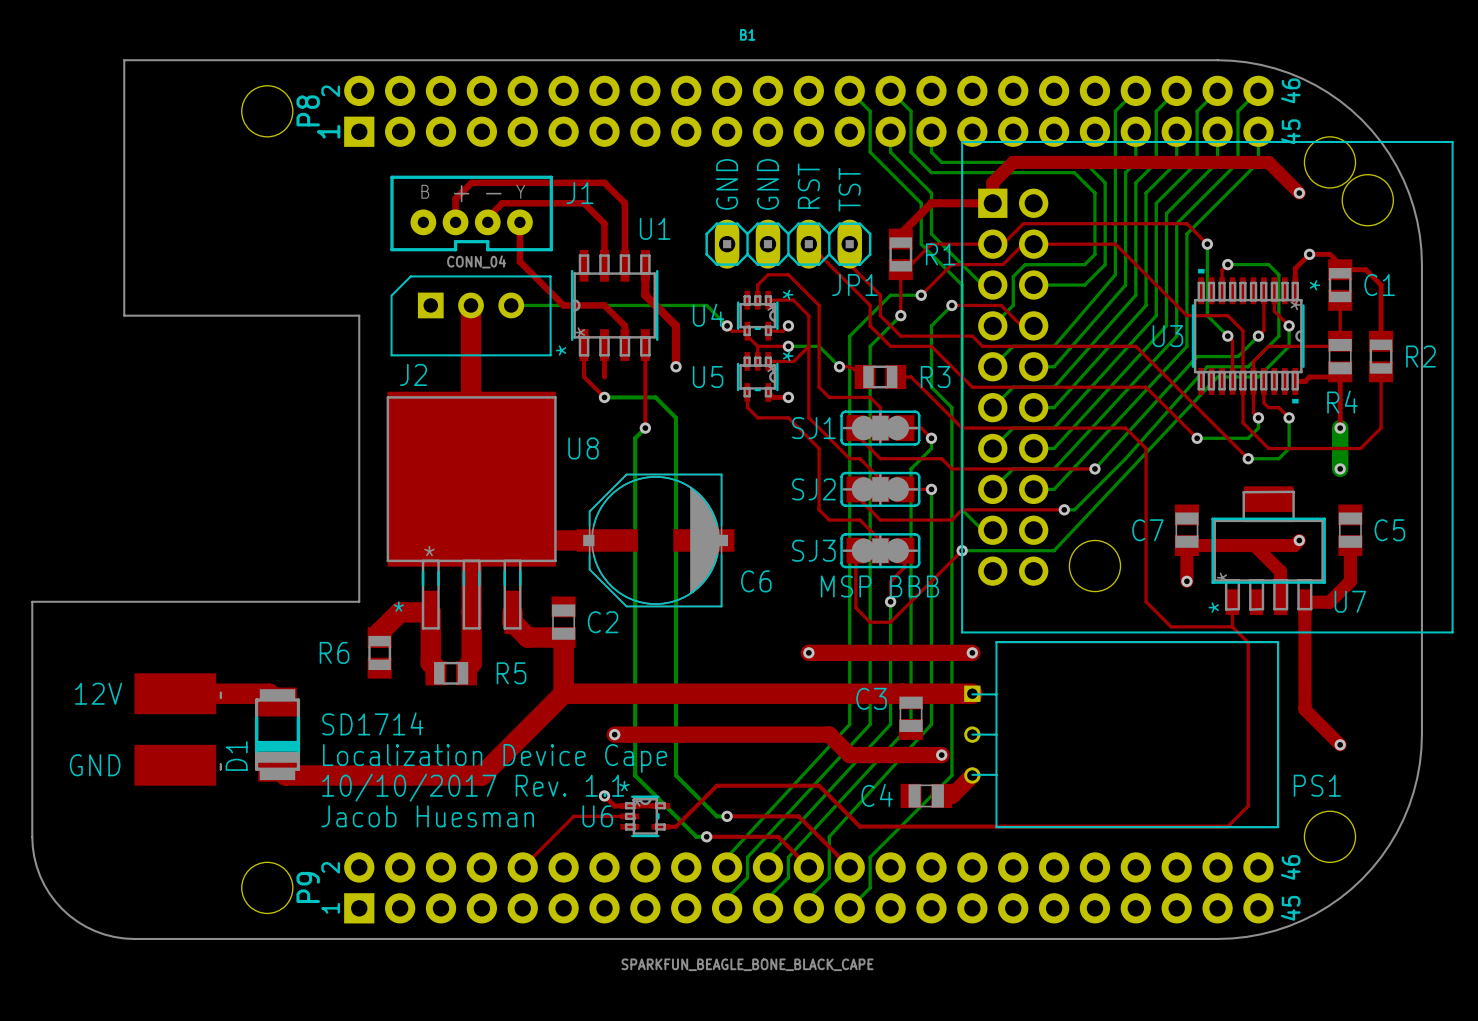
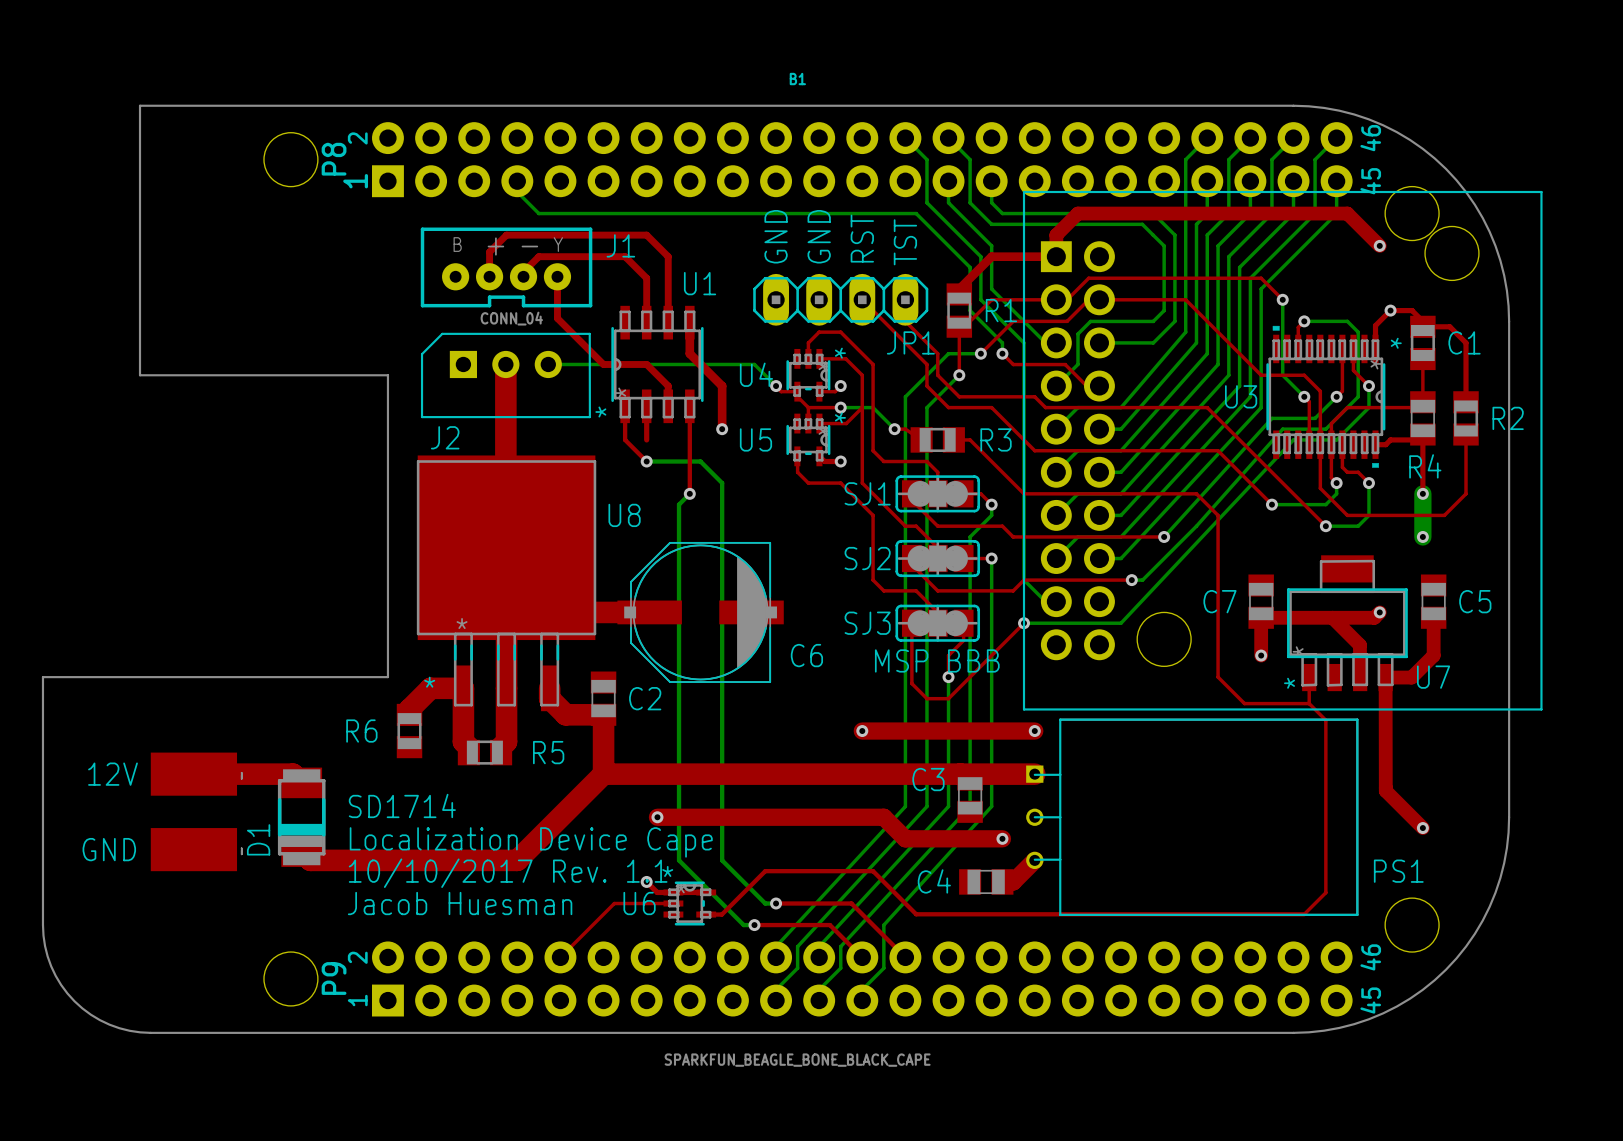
bottom track: none -> (517, 181) (517, 192) (538, 213) (916, 213) (970, 267) (970, 310) (1002, 342) (1002, 353)
top track: none -> (1002, 353) (1013, 364)
bottom track: (951, 305) (931, 325) (931, 387) (951, 407) (951, 775) (870, 857) (870, 887) (849, 908) -> none
via position: (951, 305) -> (1002, 353)

